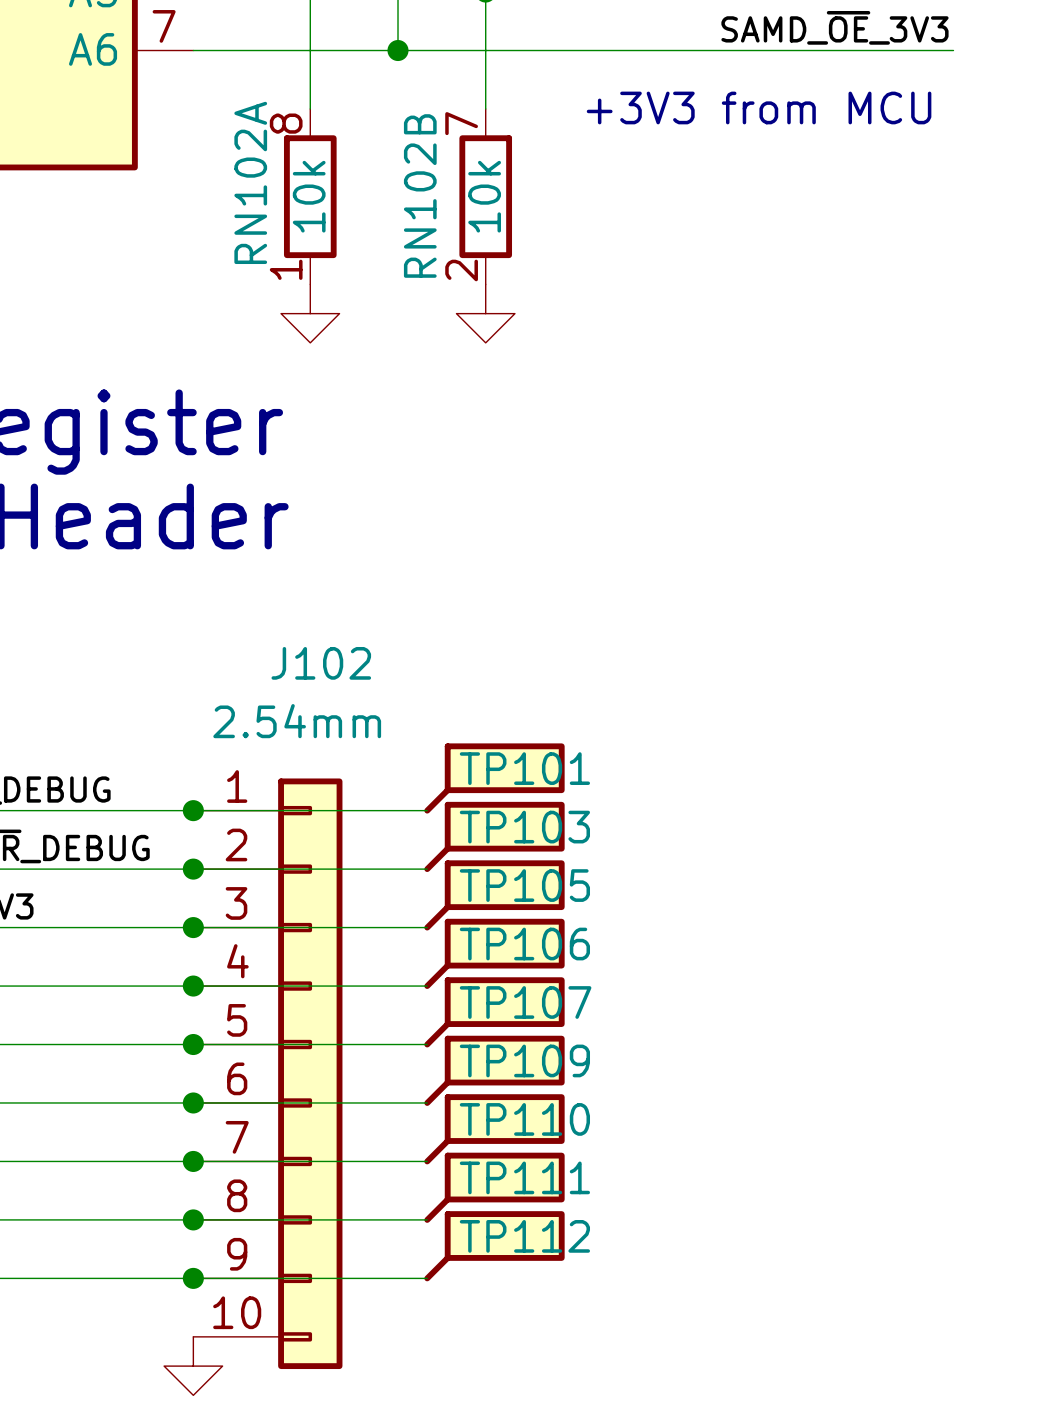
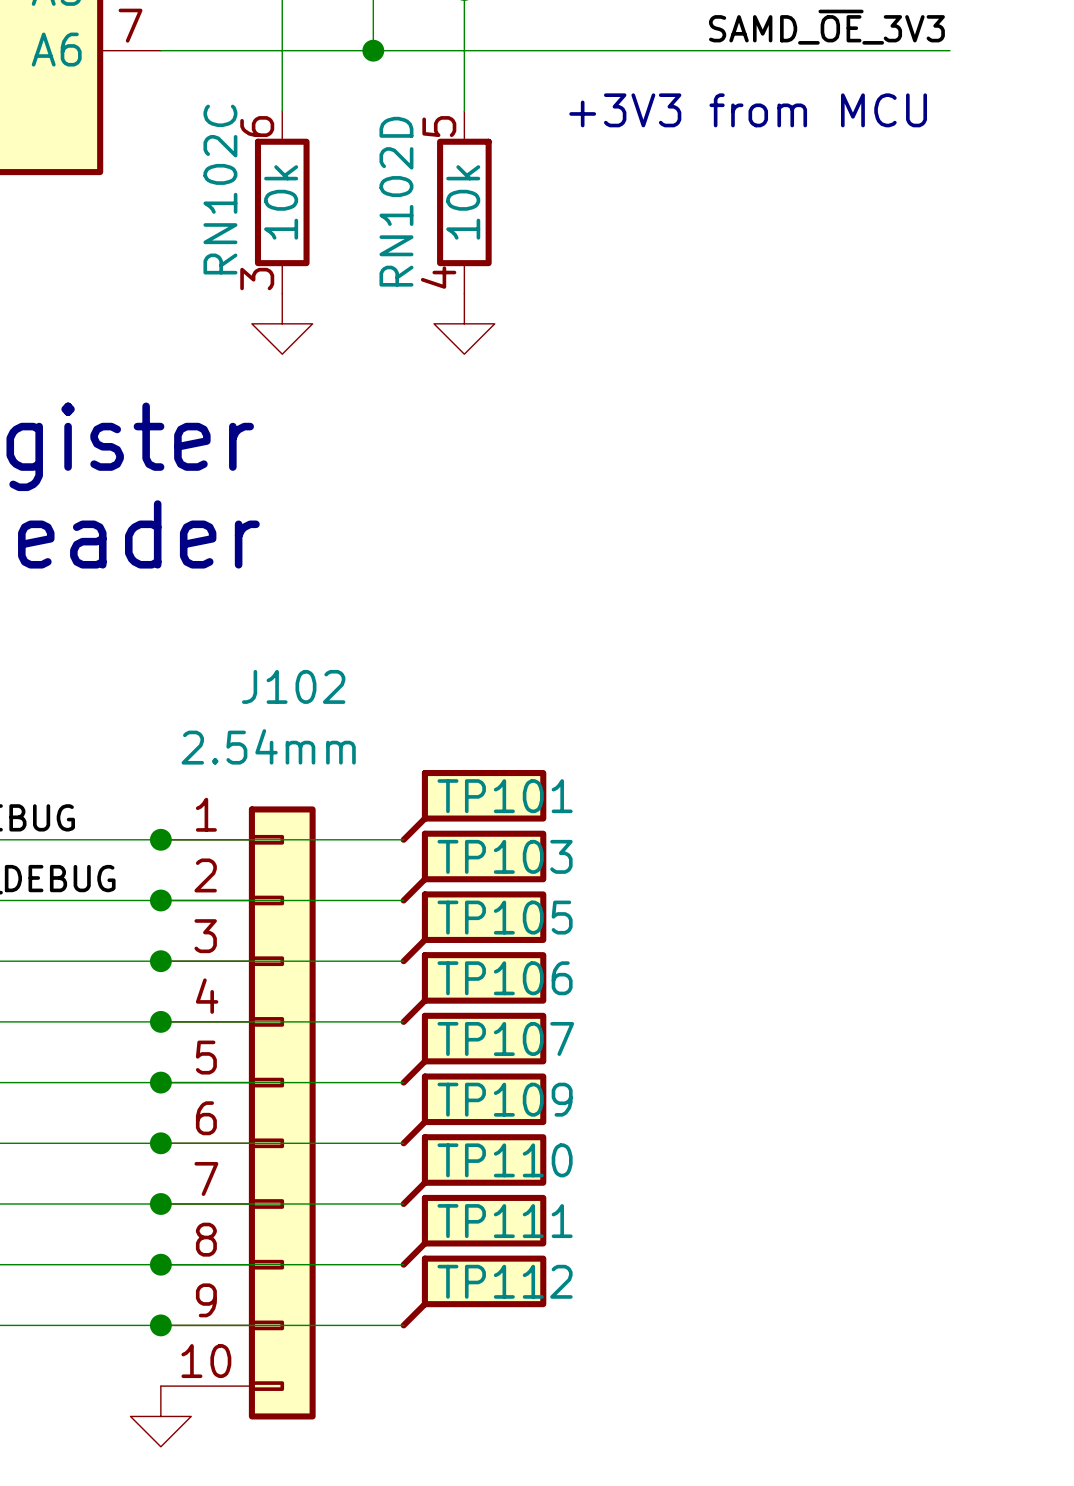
RN102A pin number: 8 (286, 123) -> 6 (257, 126)
RN102B pin number: 7 (461, 123) -> 5 (439, 126)
RN102A name: RN102A (250, 182) -> RN102C (220, 189)
RN102B name: RN102B (420, 195) -> RN102D (396, 201)
RN102A pin number: 1 (286, 269) -> 3 (257, 279)
RN102B pin number: 2 (461, 270) -> 4 (438, 277)

